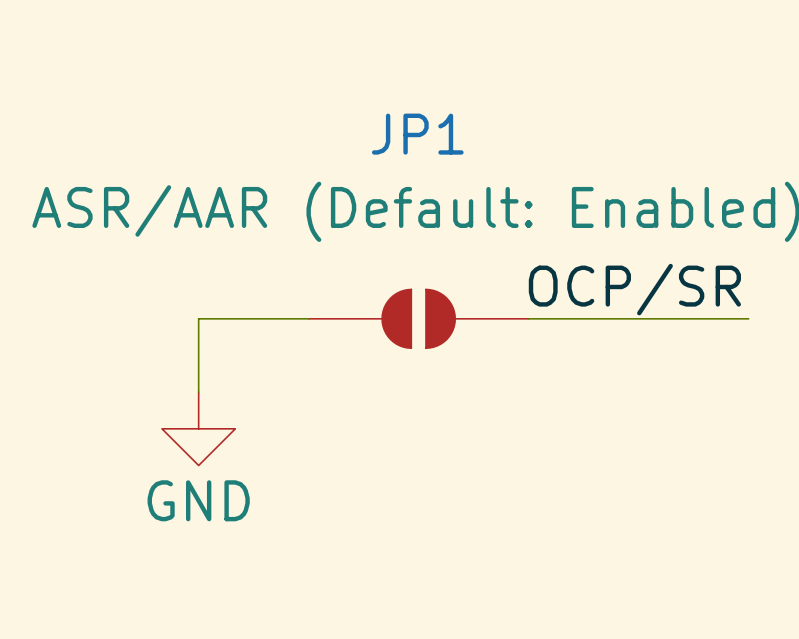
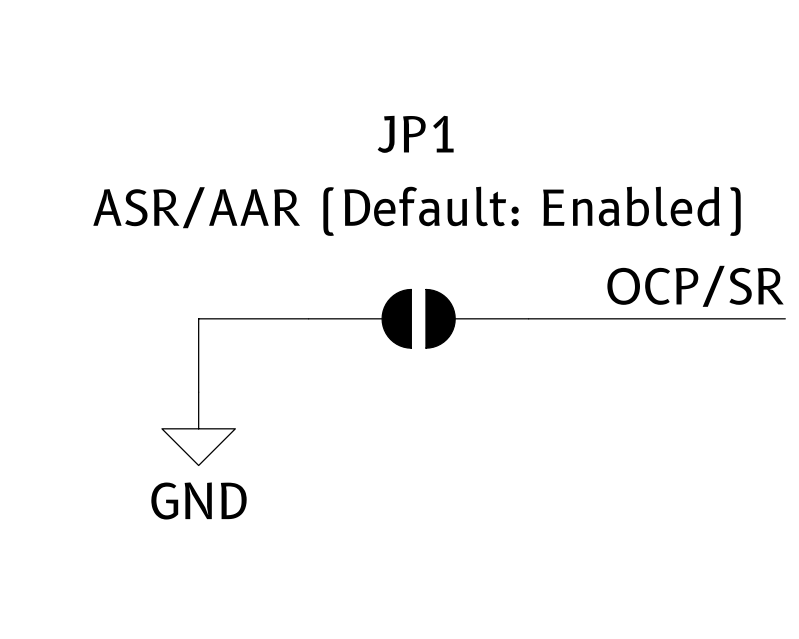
label position: OCP/SR (634, 289) -> OCP/SR (695, 286)
wire: none -> (748, 318) (785, 318)

